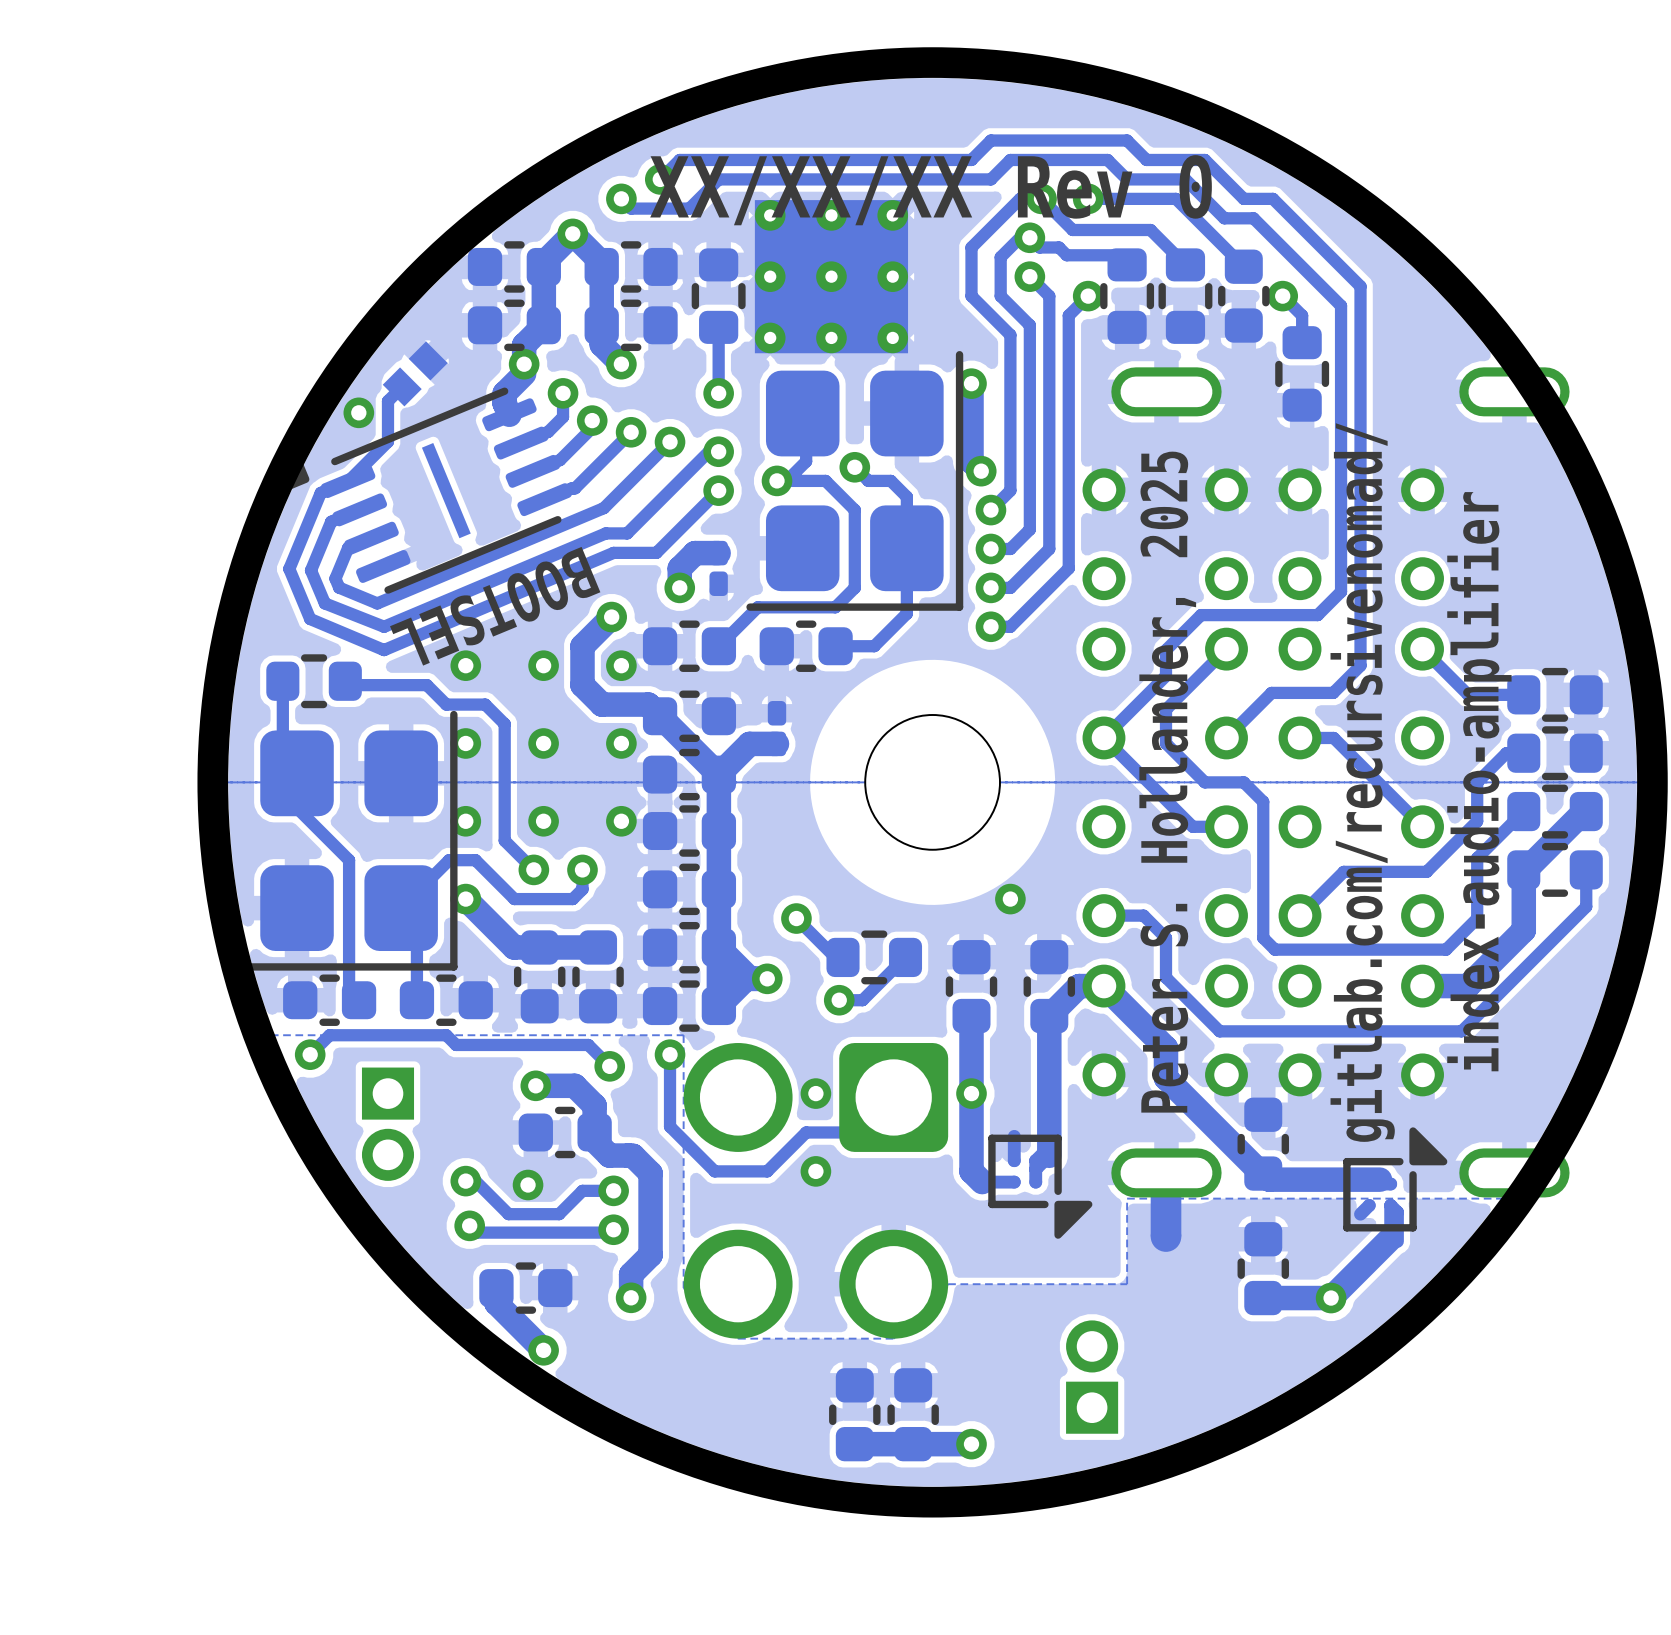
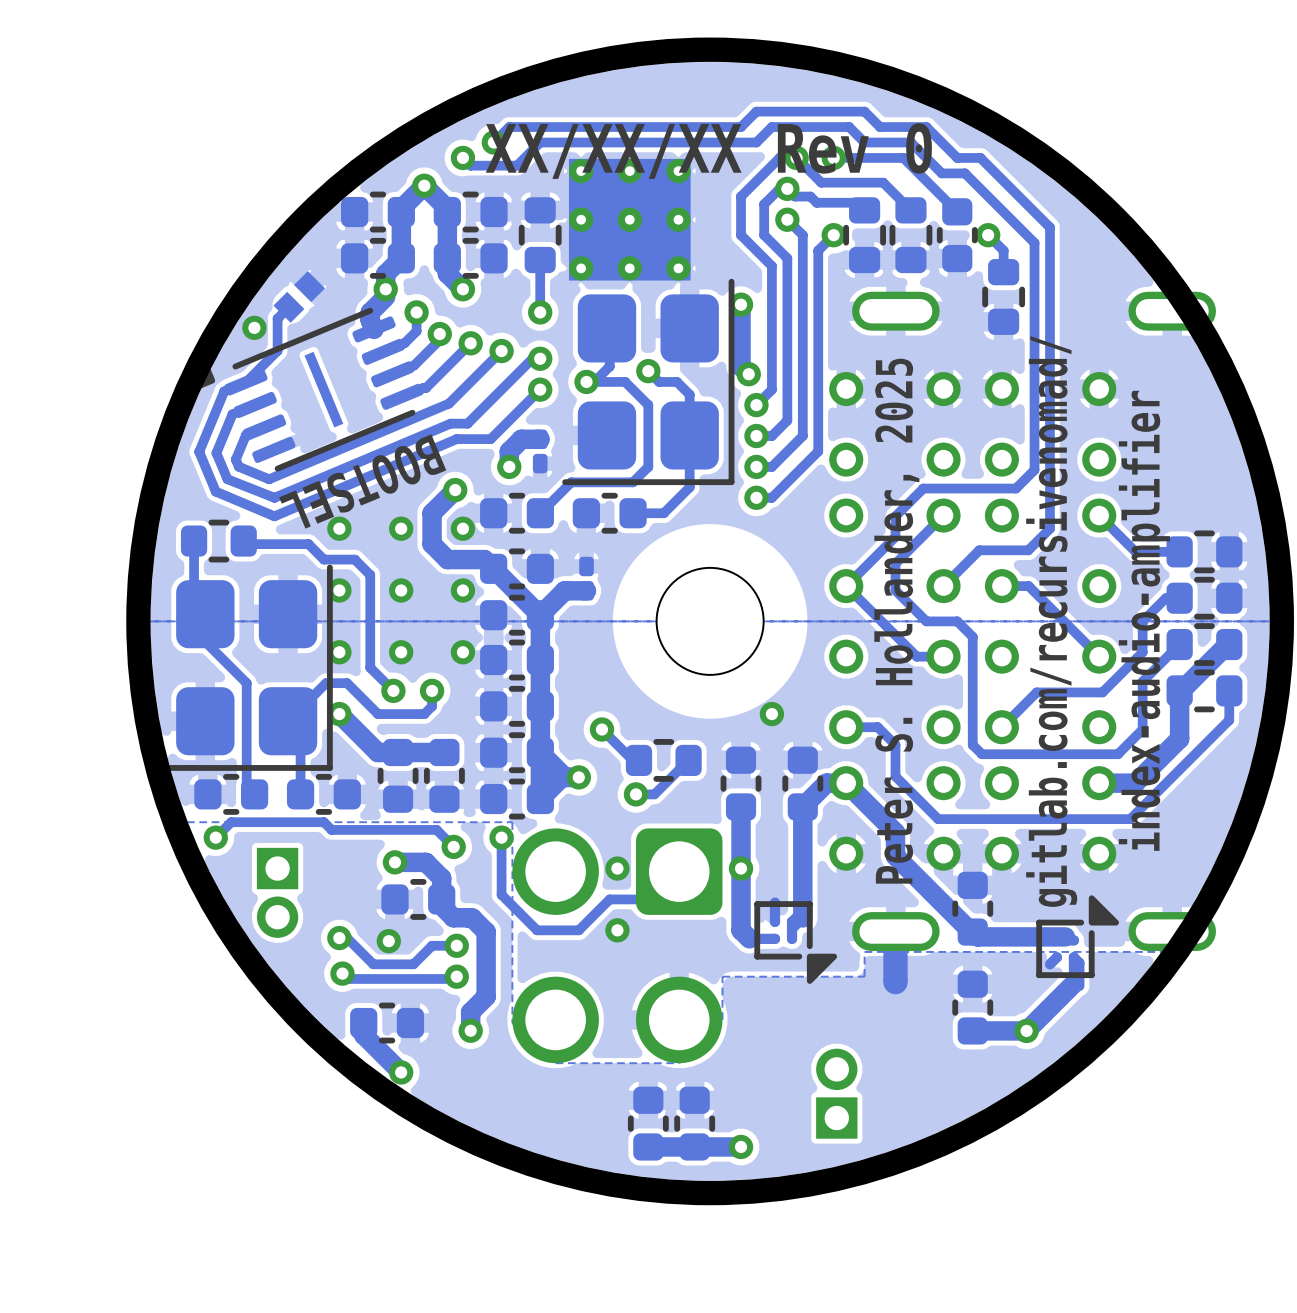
zone outline: (1127, 1229) (1127, 1284) (948, 1284) -> (864, 976) (722, 976) (722, 1019)

